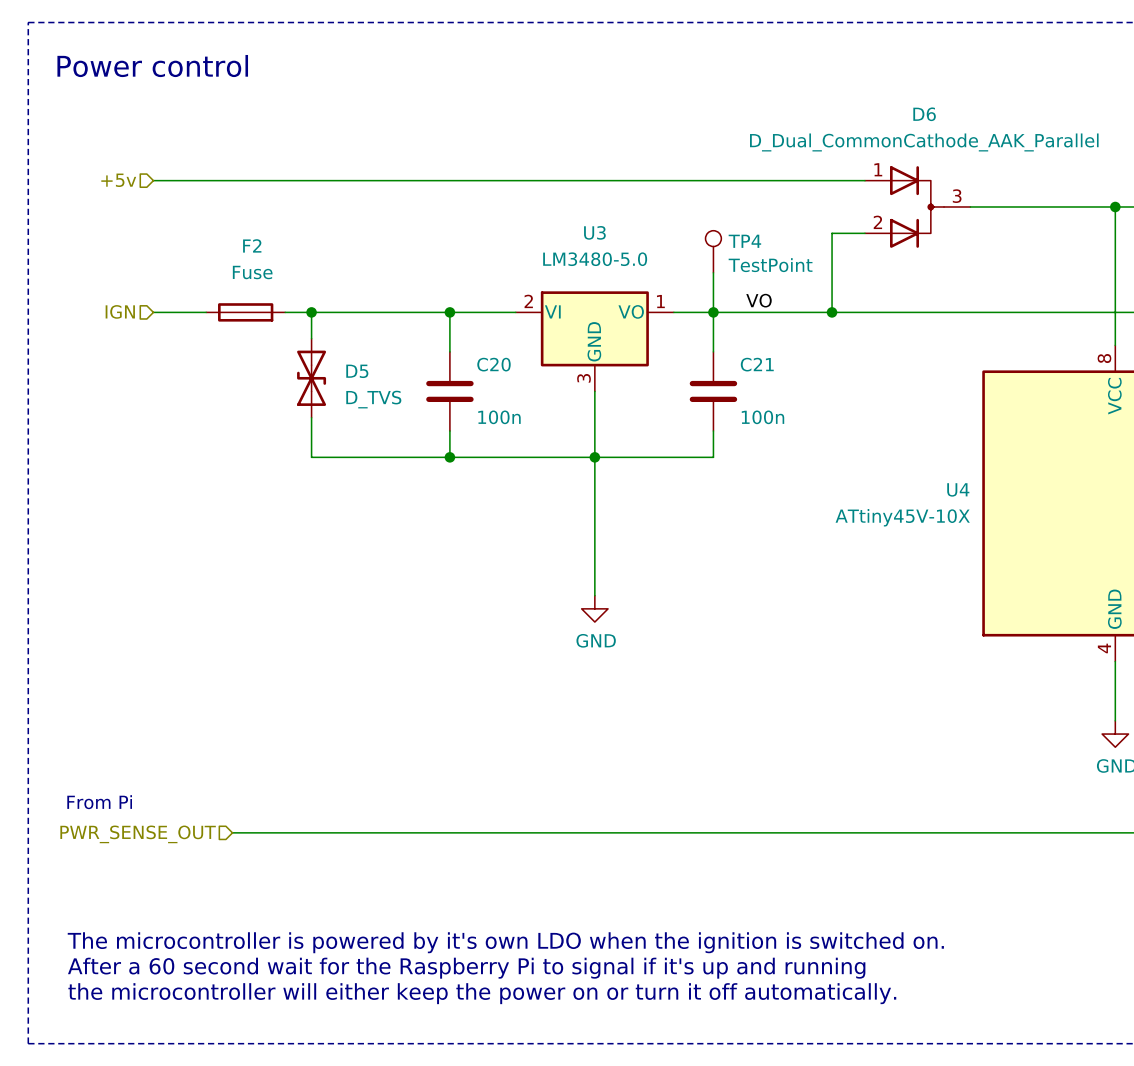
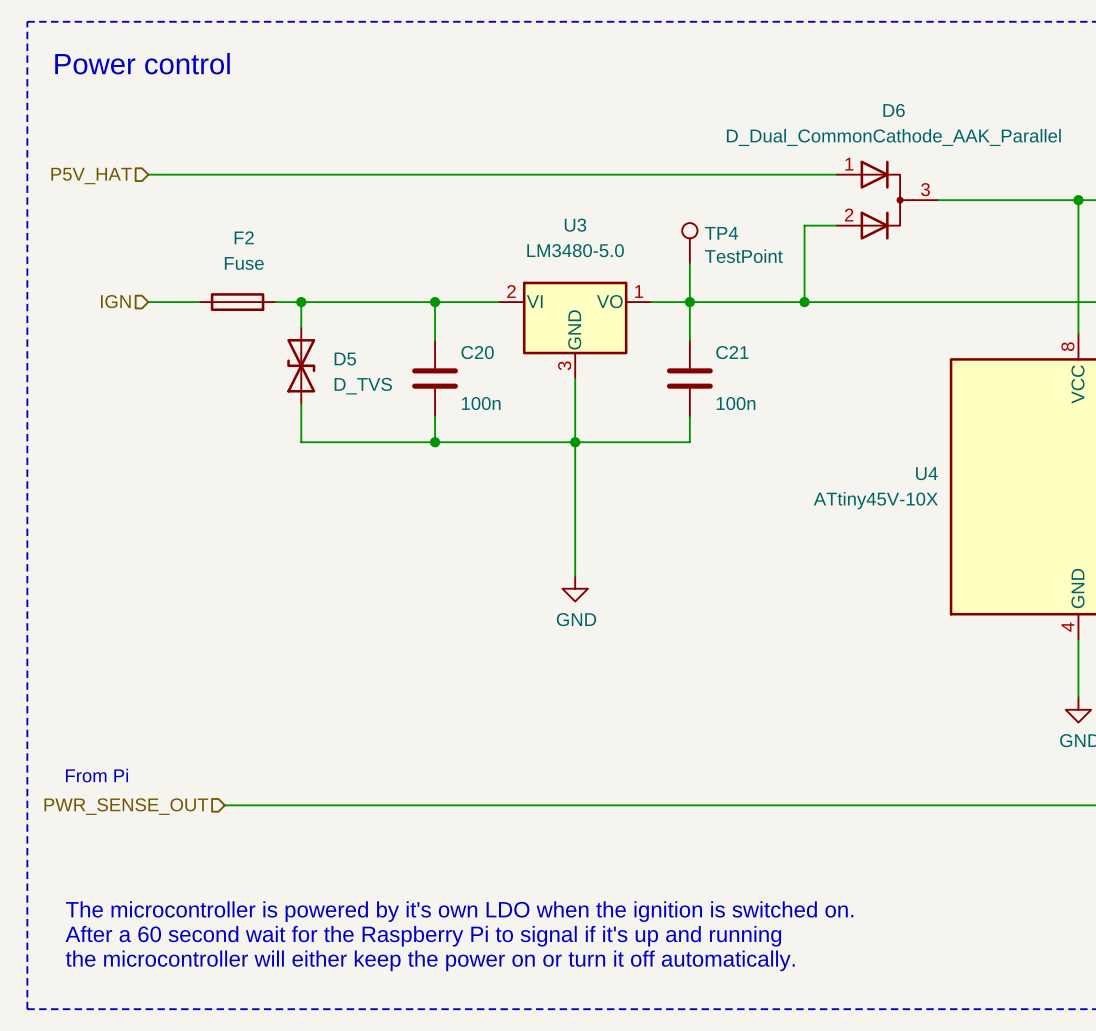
hierarchical label: +5v (118, 180) -> P5V_HAT (91, 176)
label: VO (759, 300) -> none

